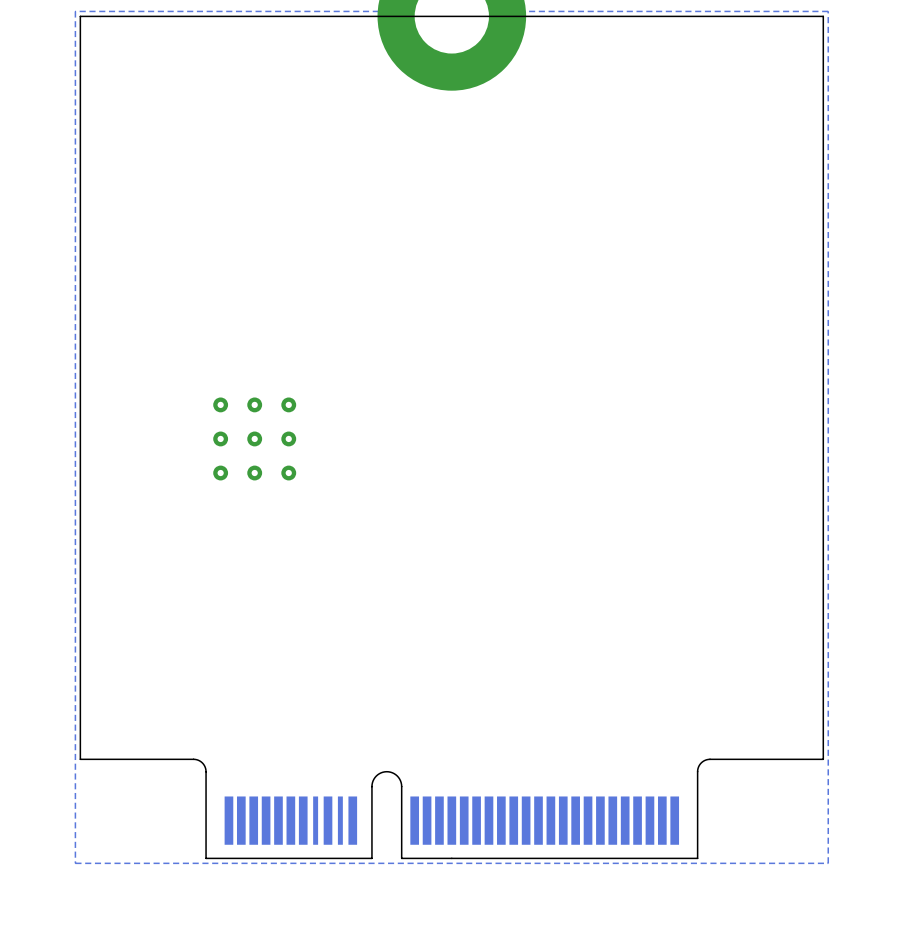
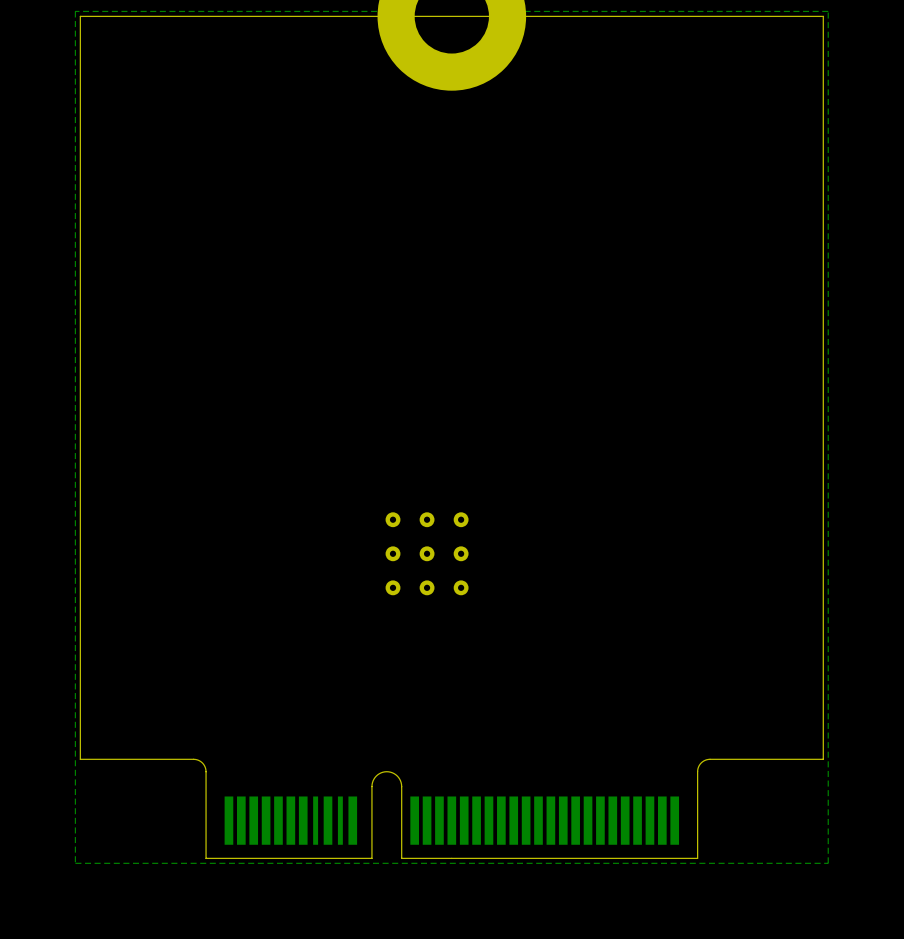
part position: (254, 438) -> (427, 553)

